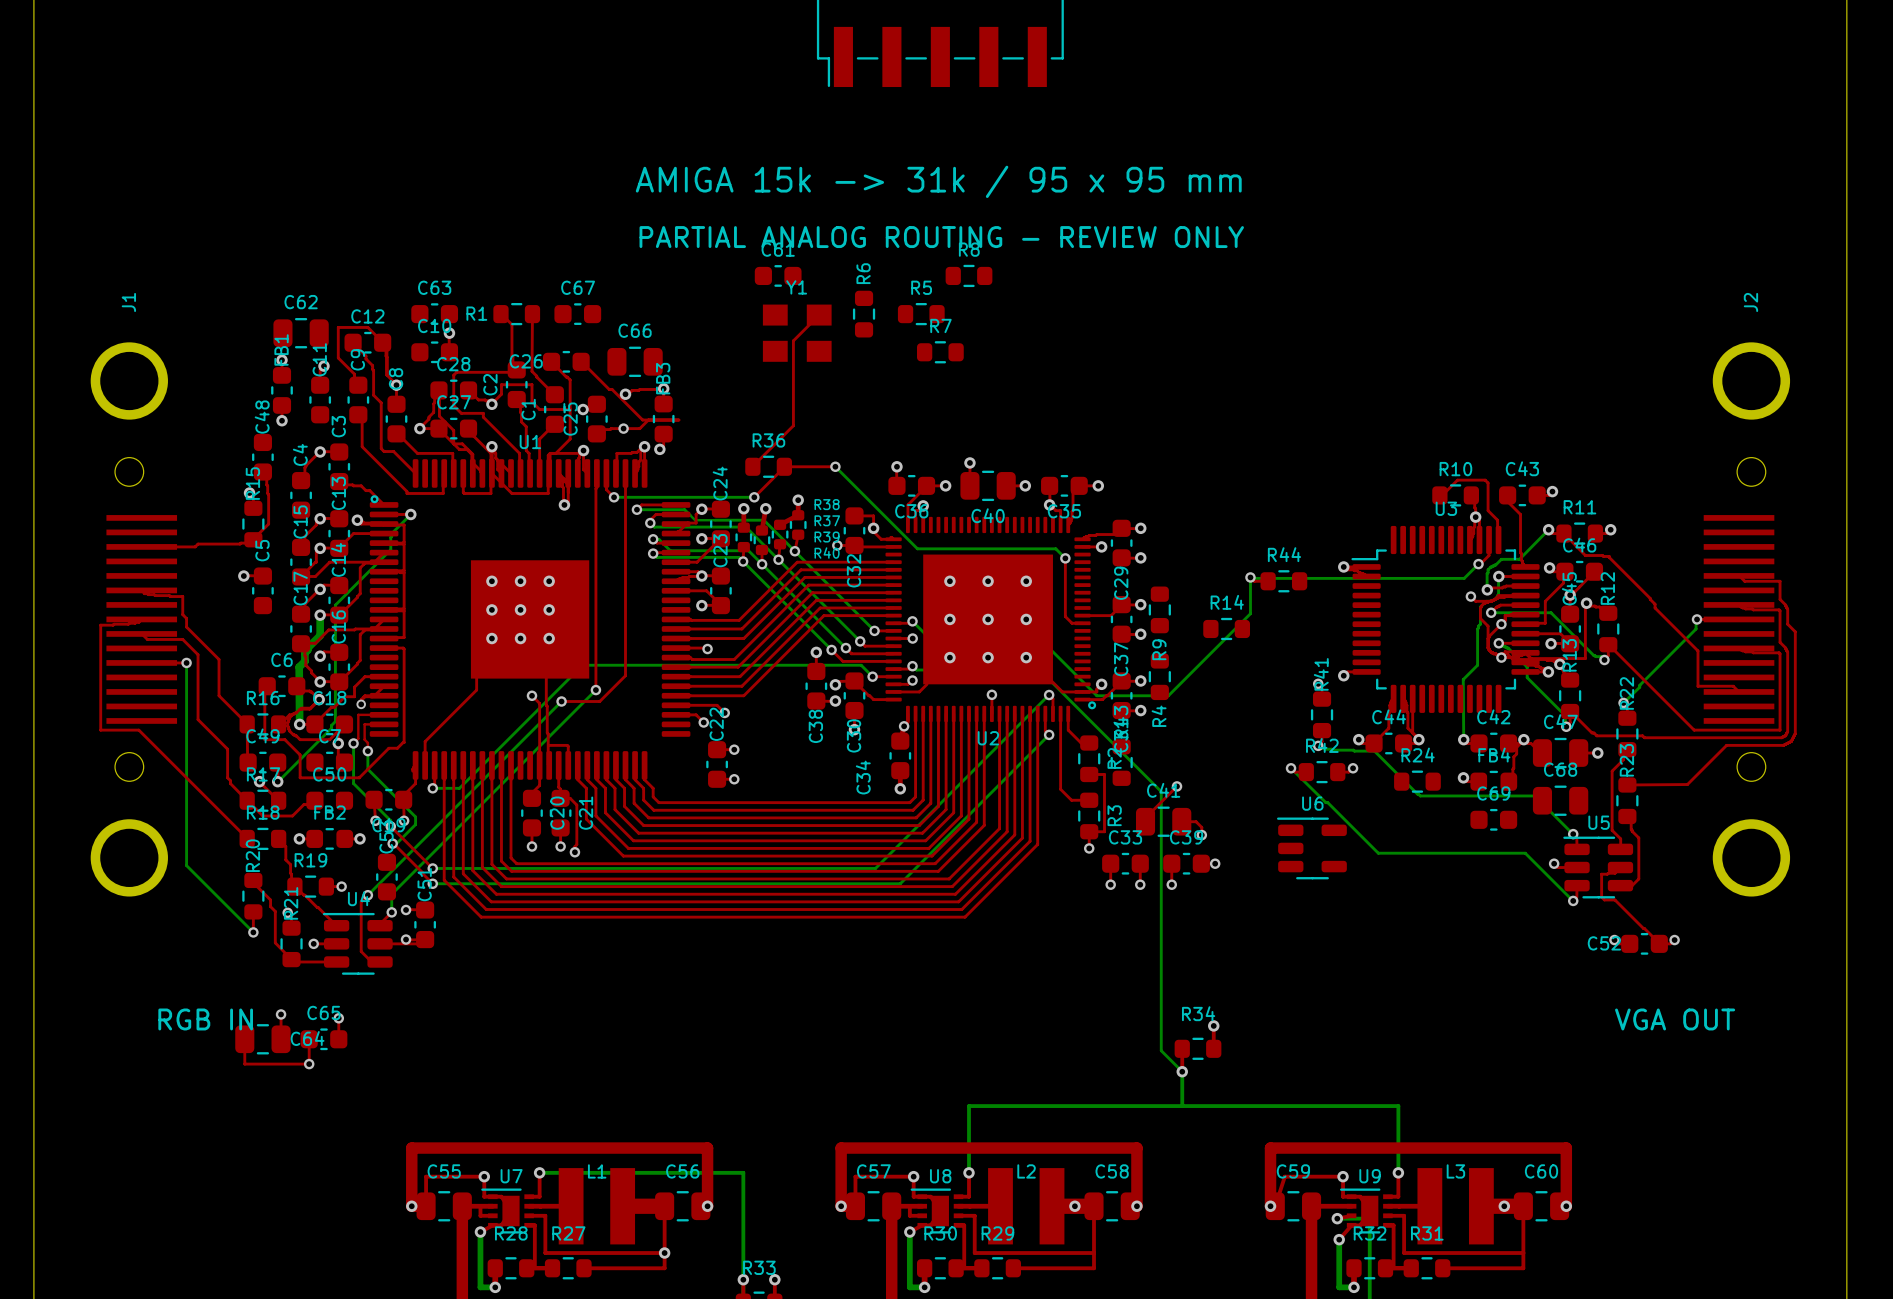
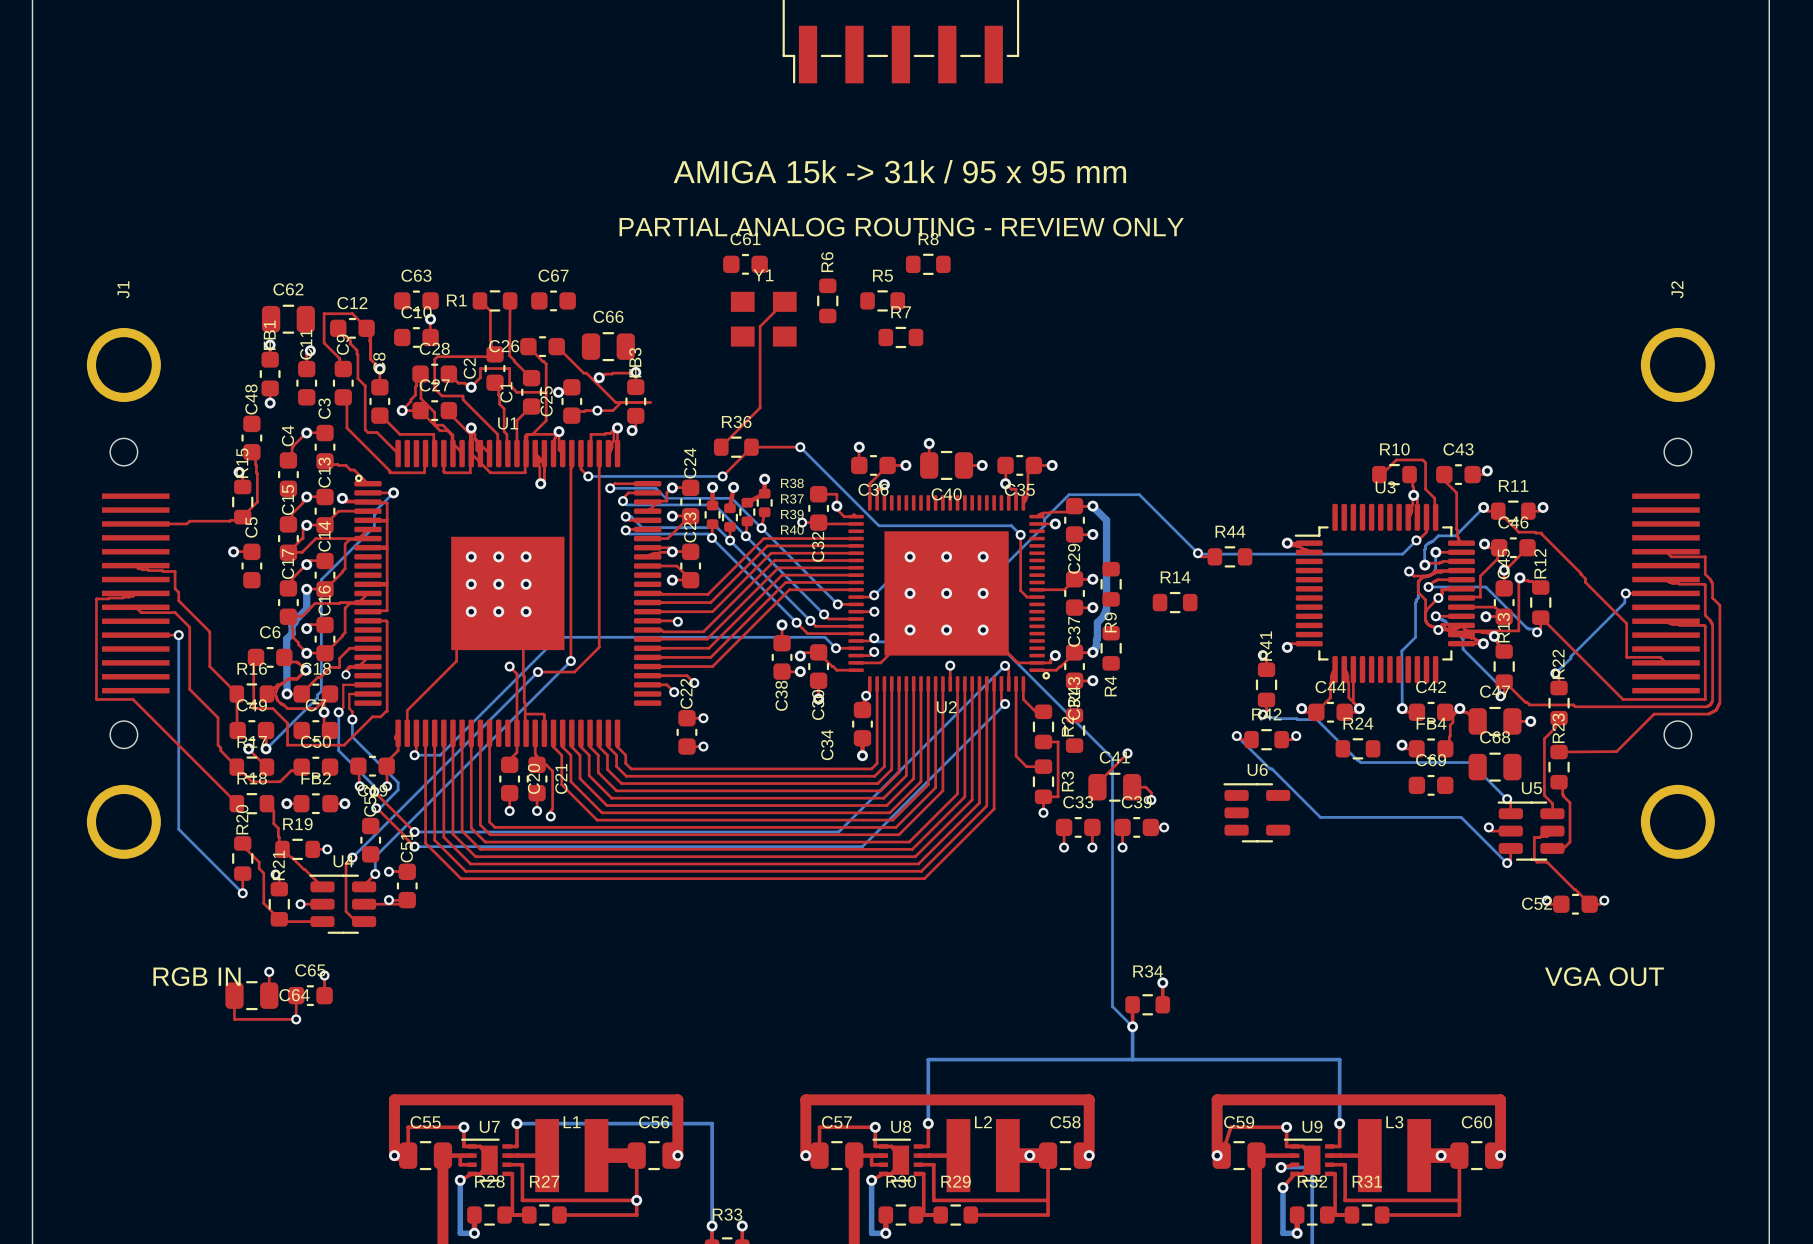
bottom track: none -> (1092, 506) (1106, 520) (1106, 609) (1097, 622) (1096, 646) (1092, 652)
bottom track: (1250, 577) (1250, 613) (1168, 695) (1096, 695) (1034, 633) (924, 633) (912, 621) -> (1197, 553) (1139, 494) (1069, 494) (1044, 519) (1044, 525) (995, 575) (894, 575) (874, 595)

